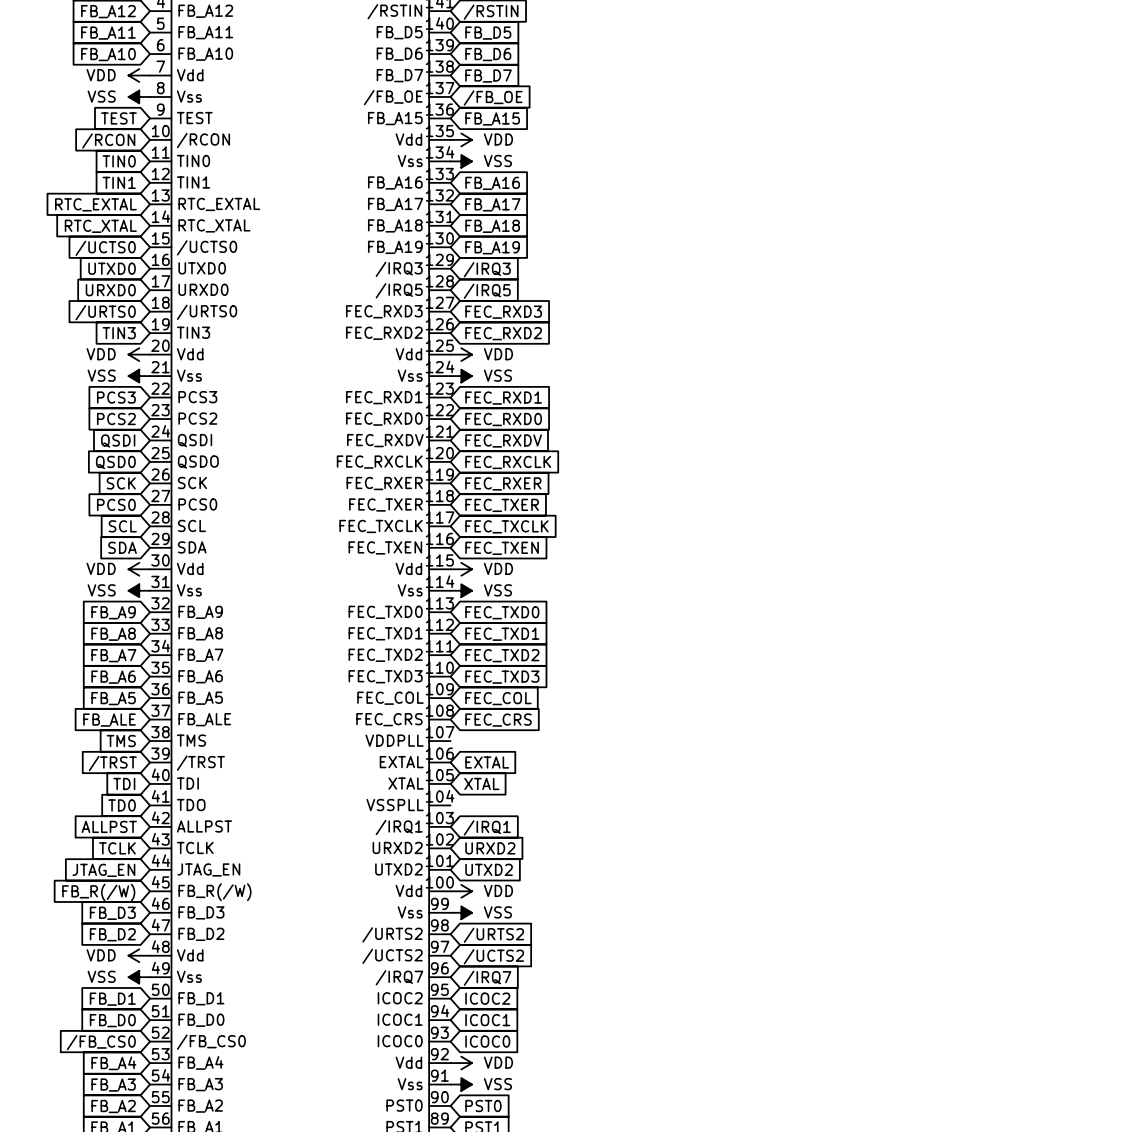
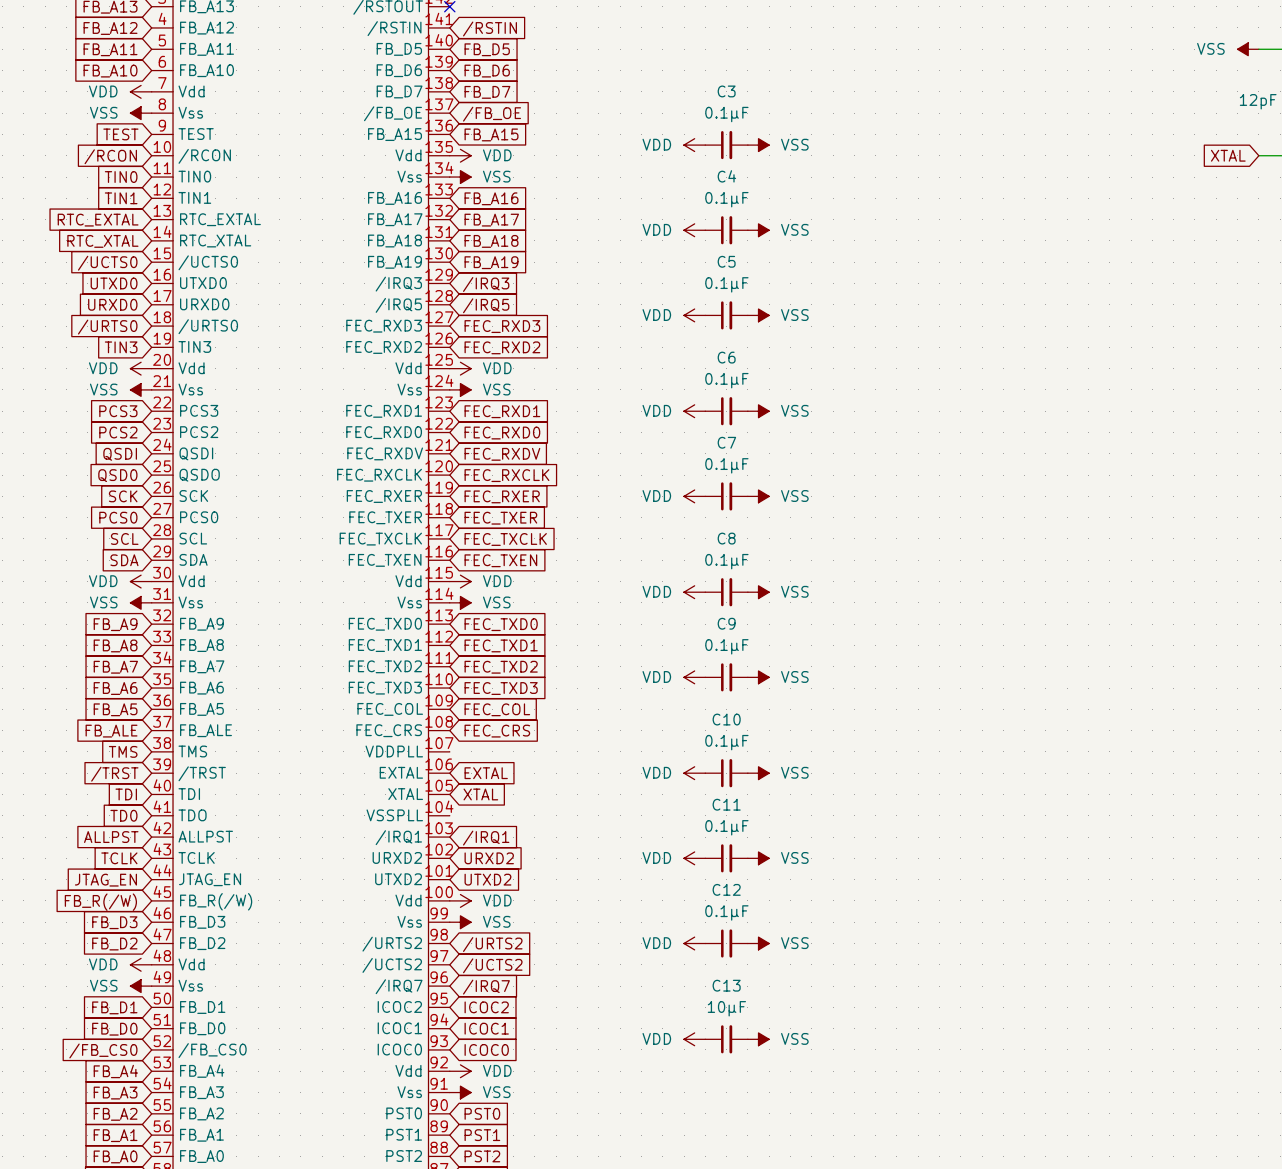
power symbol: none -> VDD (694, 145)
C3: none -> 0.1µF (726, 145)
power symbol: none -> VSS (758, 145)
power symbol: none -> VDD (694, 230)
C4: none -> 0.1µF (726, 230)
power symbol: none -> VSS (758, 230)
power symbol: none -> VDD (694, 315)
C5: none -> 0.1µF (726, 315)
power symbol: none -> VSS (758, 315)
power symbol: none -> VDD (694, 411)
C6: none -> 0.1µF (726, 411)
power symbol: none -> VSS (758, 411)
power symbol: none -> VDD (694, 496)
C7: none -> 0.1µF (726, 496)
power symbol: none -> VSS (758, 496)
power symbol: none -> VDD (694, 592)
C8: none -> 0.1µF (726, 592)
power symbol: none -> VSS (758, 592)
power symbol: none -> VDD (694, 677)
C9: none -> 0.1µF (726, 677)
power symbol: none -> VSS (758, 677)
power symbol: none -> VDD (694, 773)
C10: none -> 0.1µF (726, 773)
power symbol: none -> VSS (758, 773)
power symbol: none -> VDD (694, 858)
C11: none -> 0.1µF (726, 858)
power symbol: none -> VSS (758, 858)
power symbol: none -> VDD (694, 943)
C12: none -> 0.1µF (726, 943)
power symbol: none -> VSS (758, 943)
power symbol: none -> VDD (694, 1039)
C13: none -> 10µF (726, 1039)
power symbol: none -> VSS (758, 1039)

